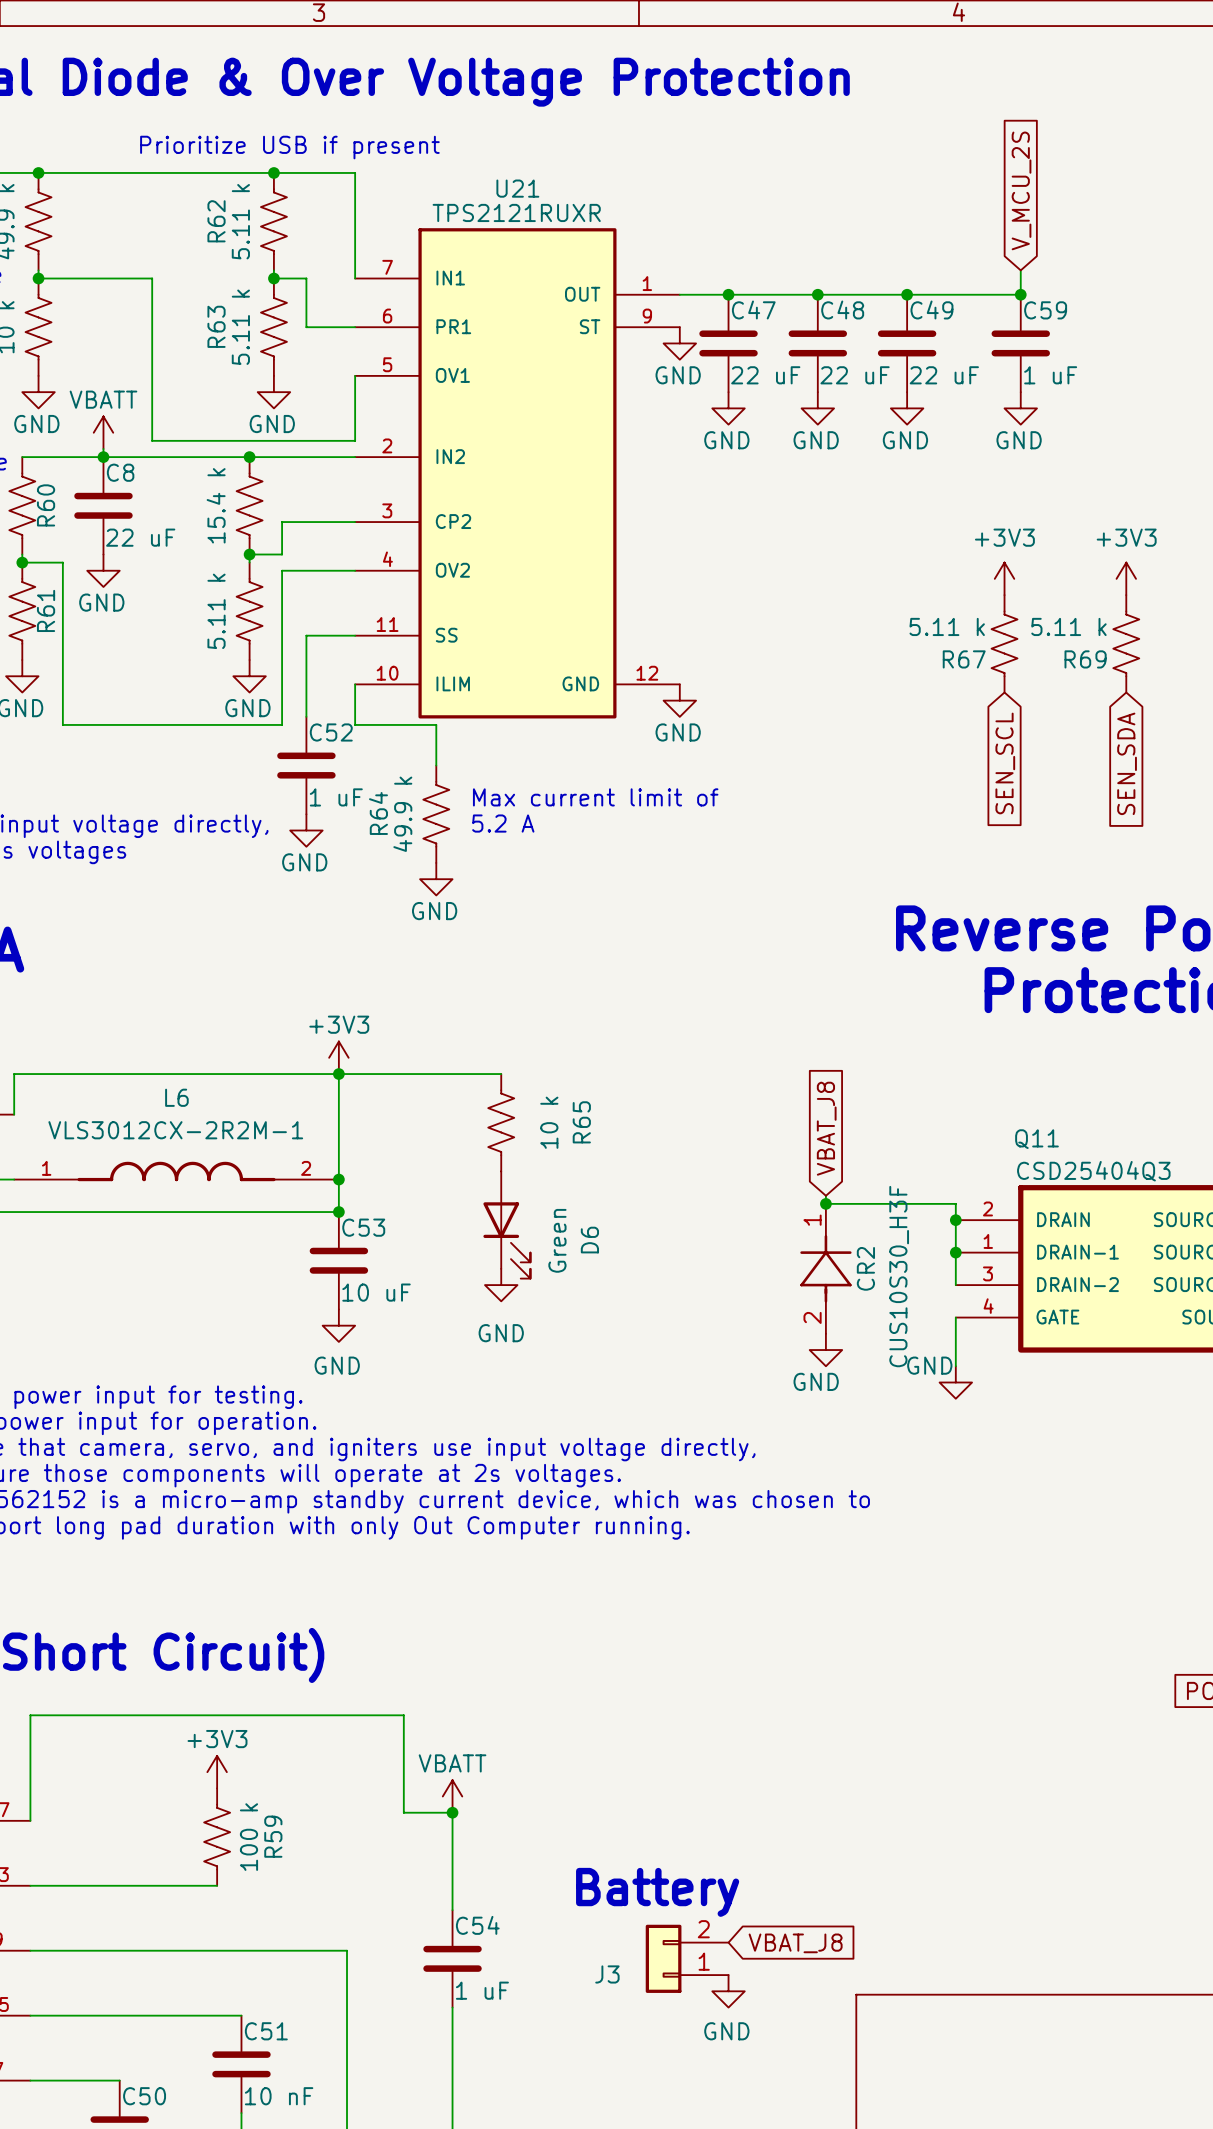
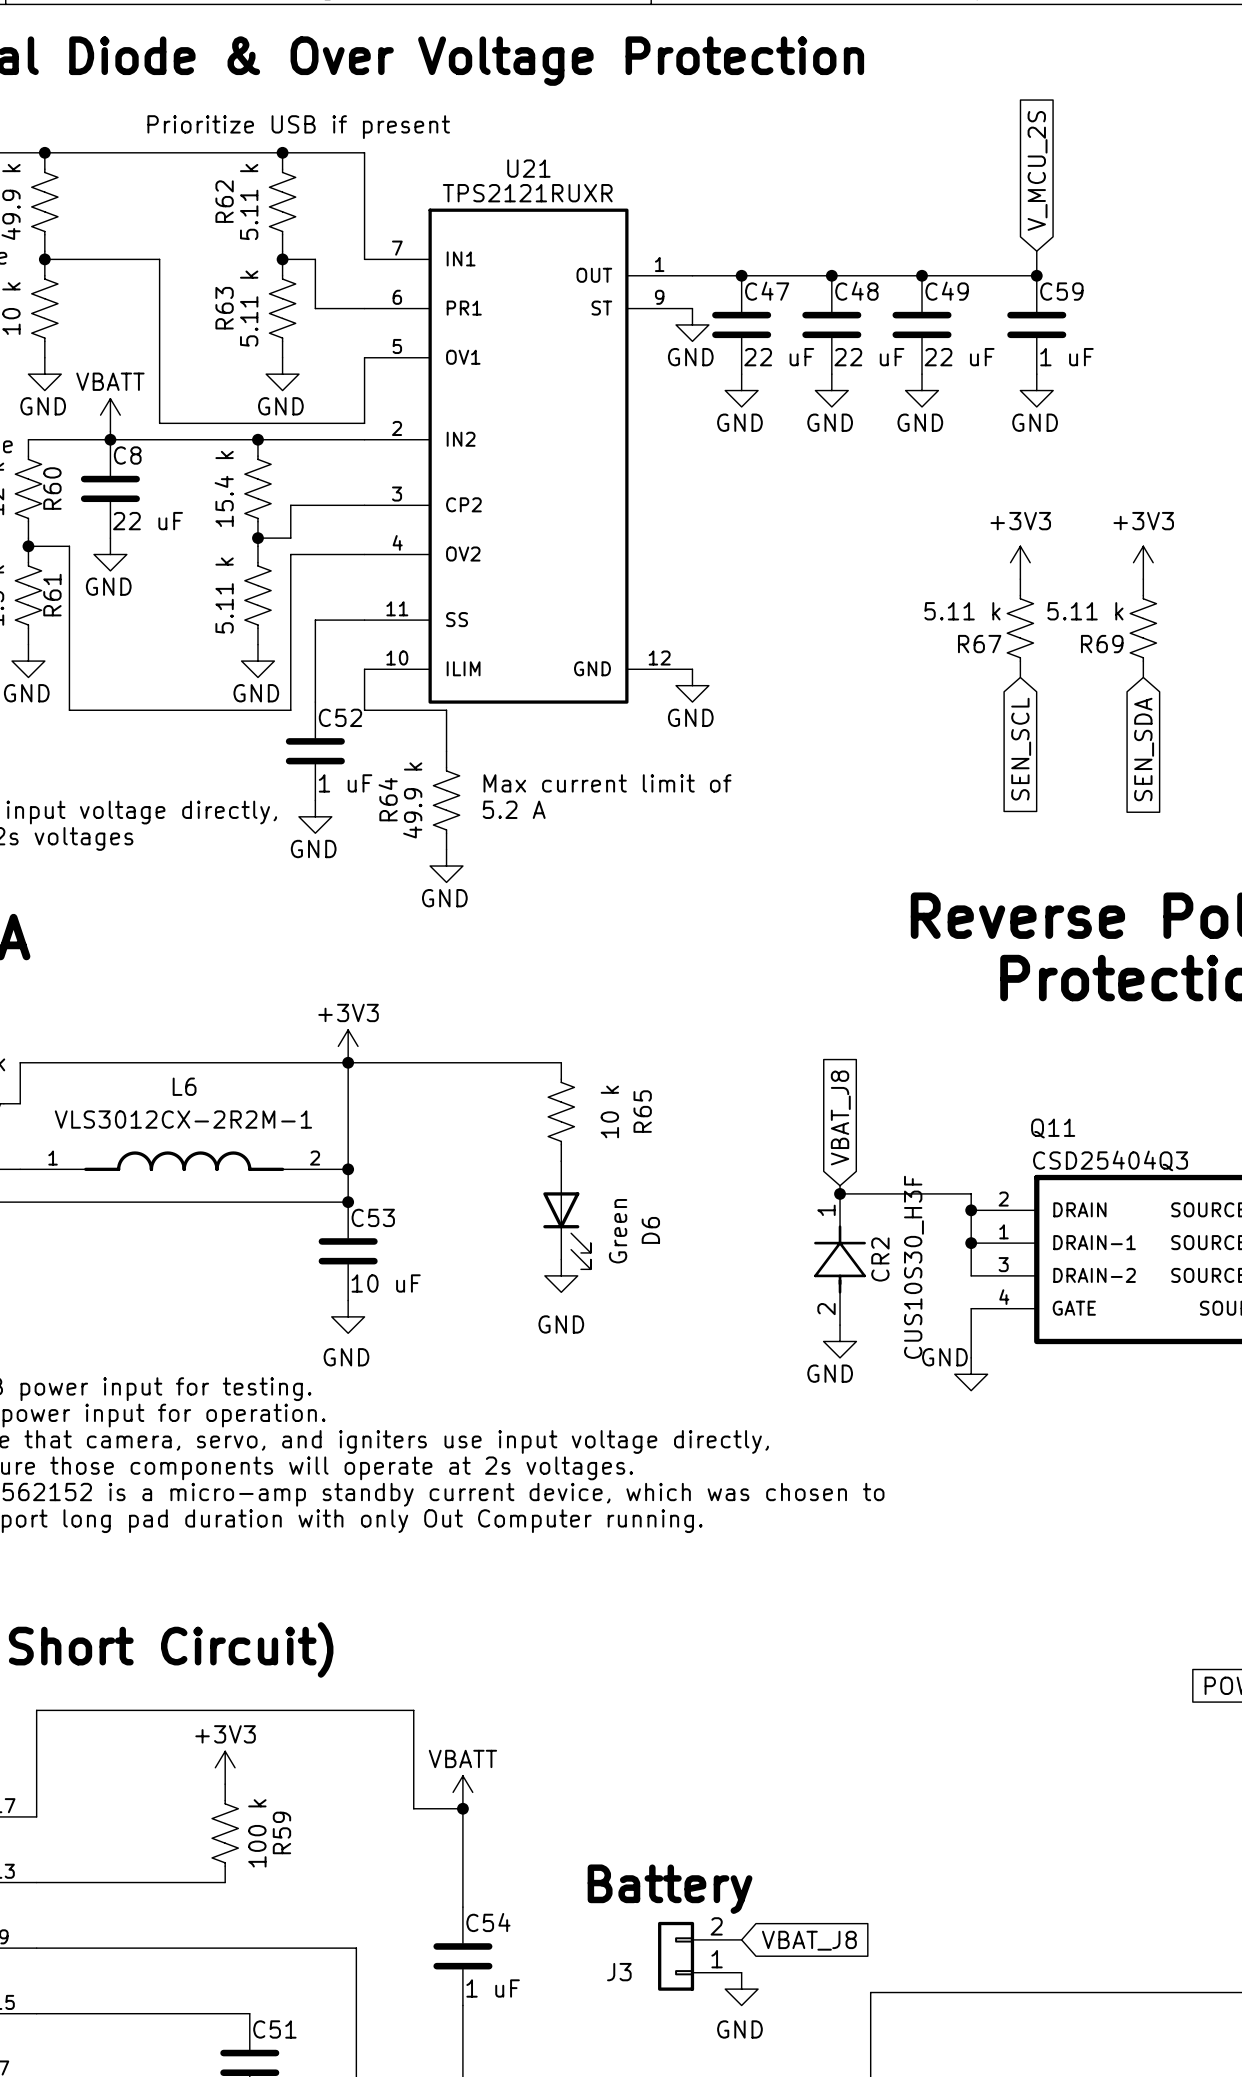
wire: none -> (512, 1062) (561, 1062)
R65 position: (501, 1122) -> (561, 1111)
D6 position: (506, 1225) -> (567, 1215)
power symbol position: GND (501, 1285) -> GND (561, 1275)

